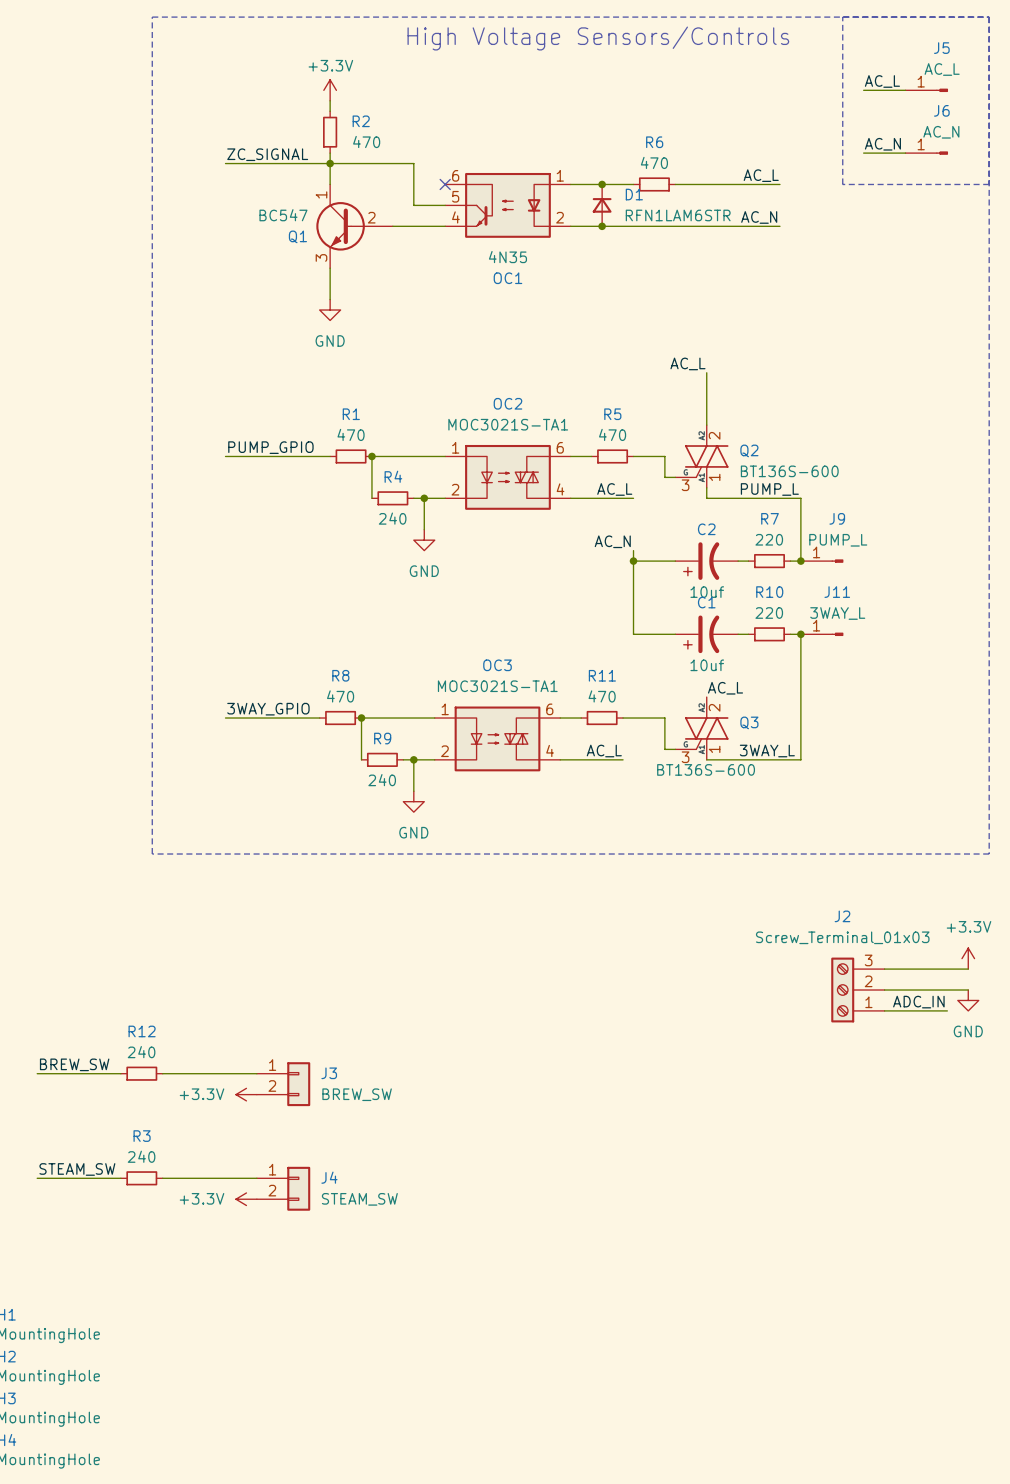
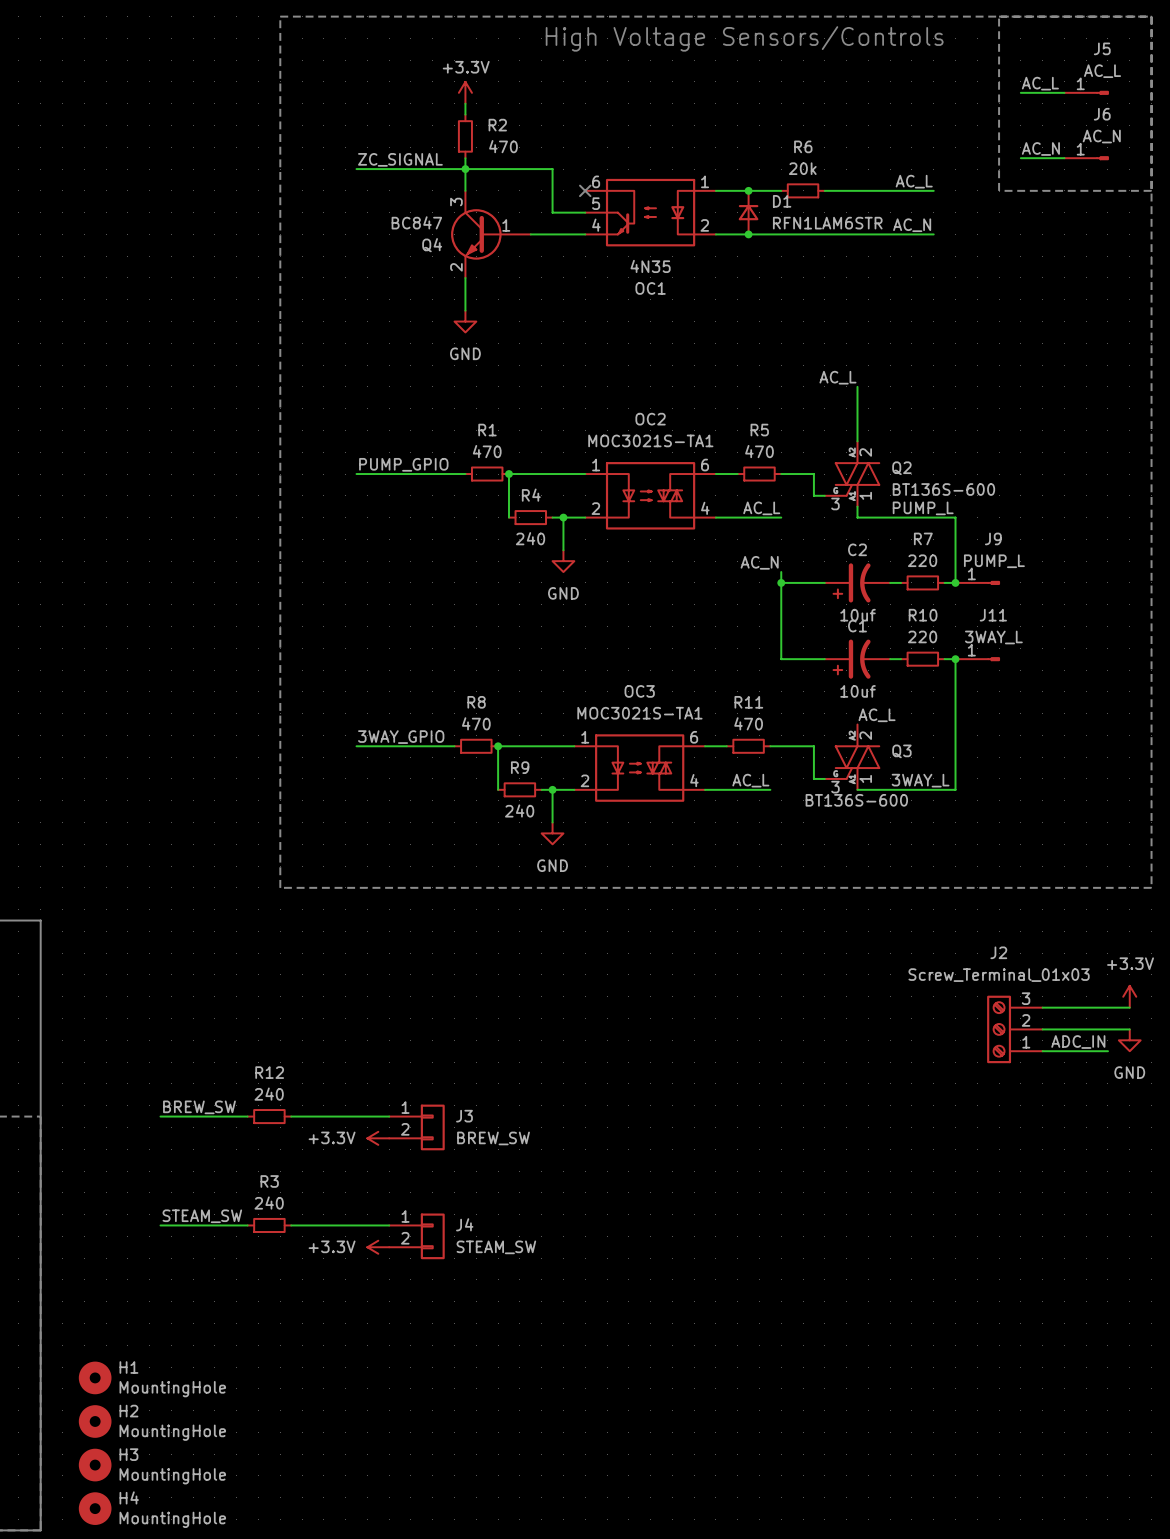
R6 value: 470 (654, 162) -> 20k (802, 168)
Q1: BC547 (354, 226) -> none
Q4: none -> BC847 (490, 234)

